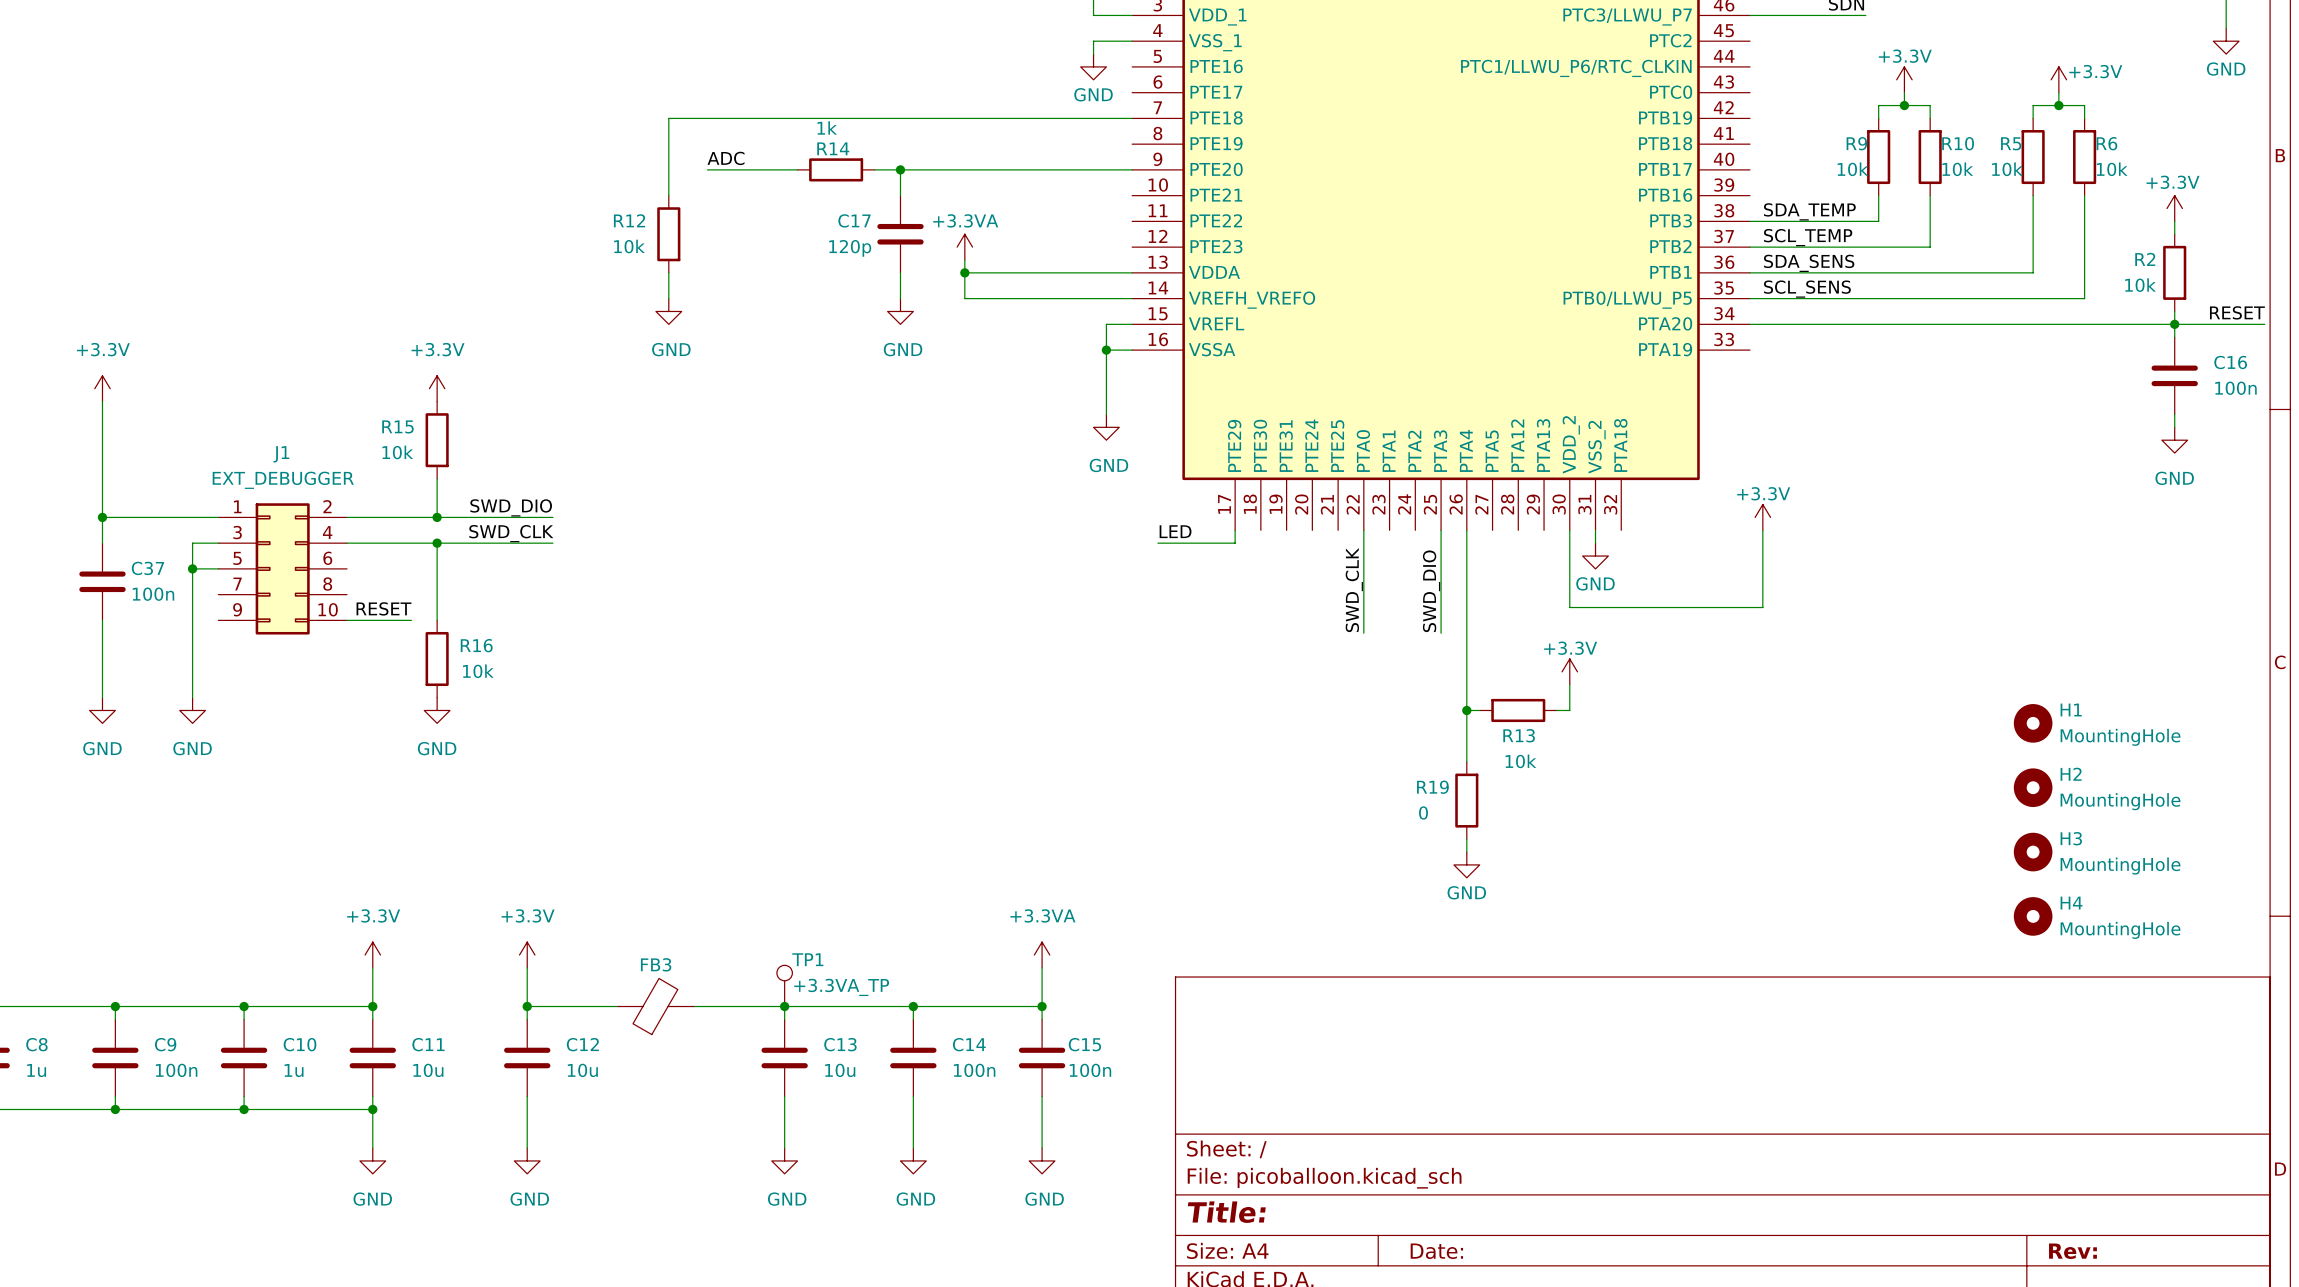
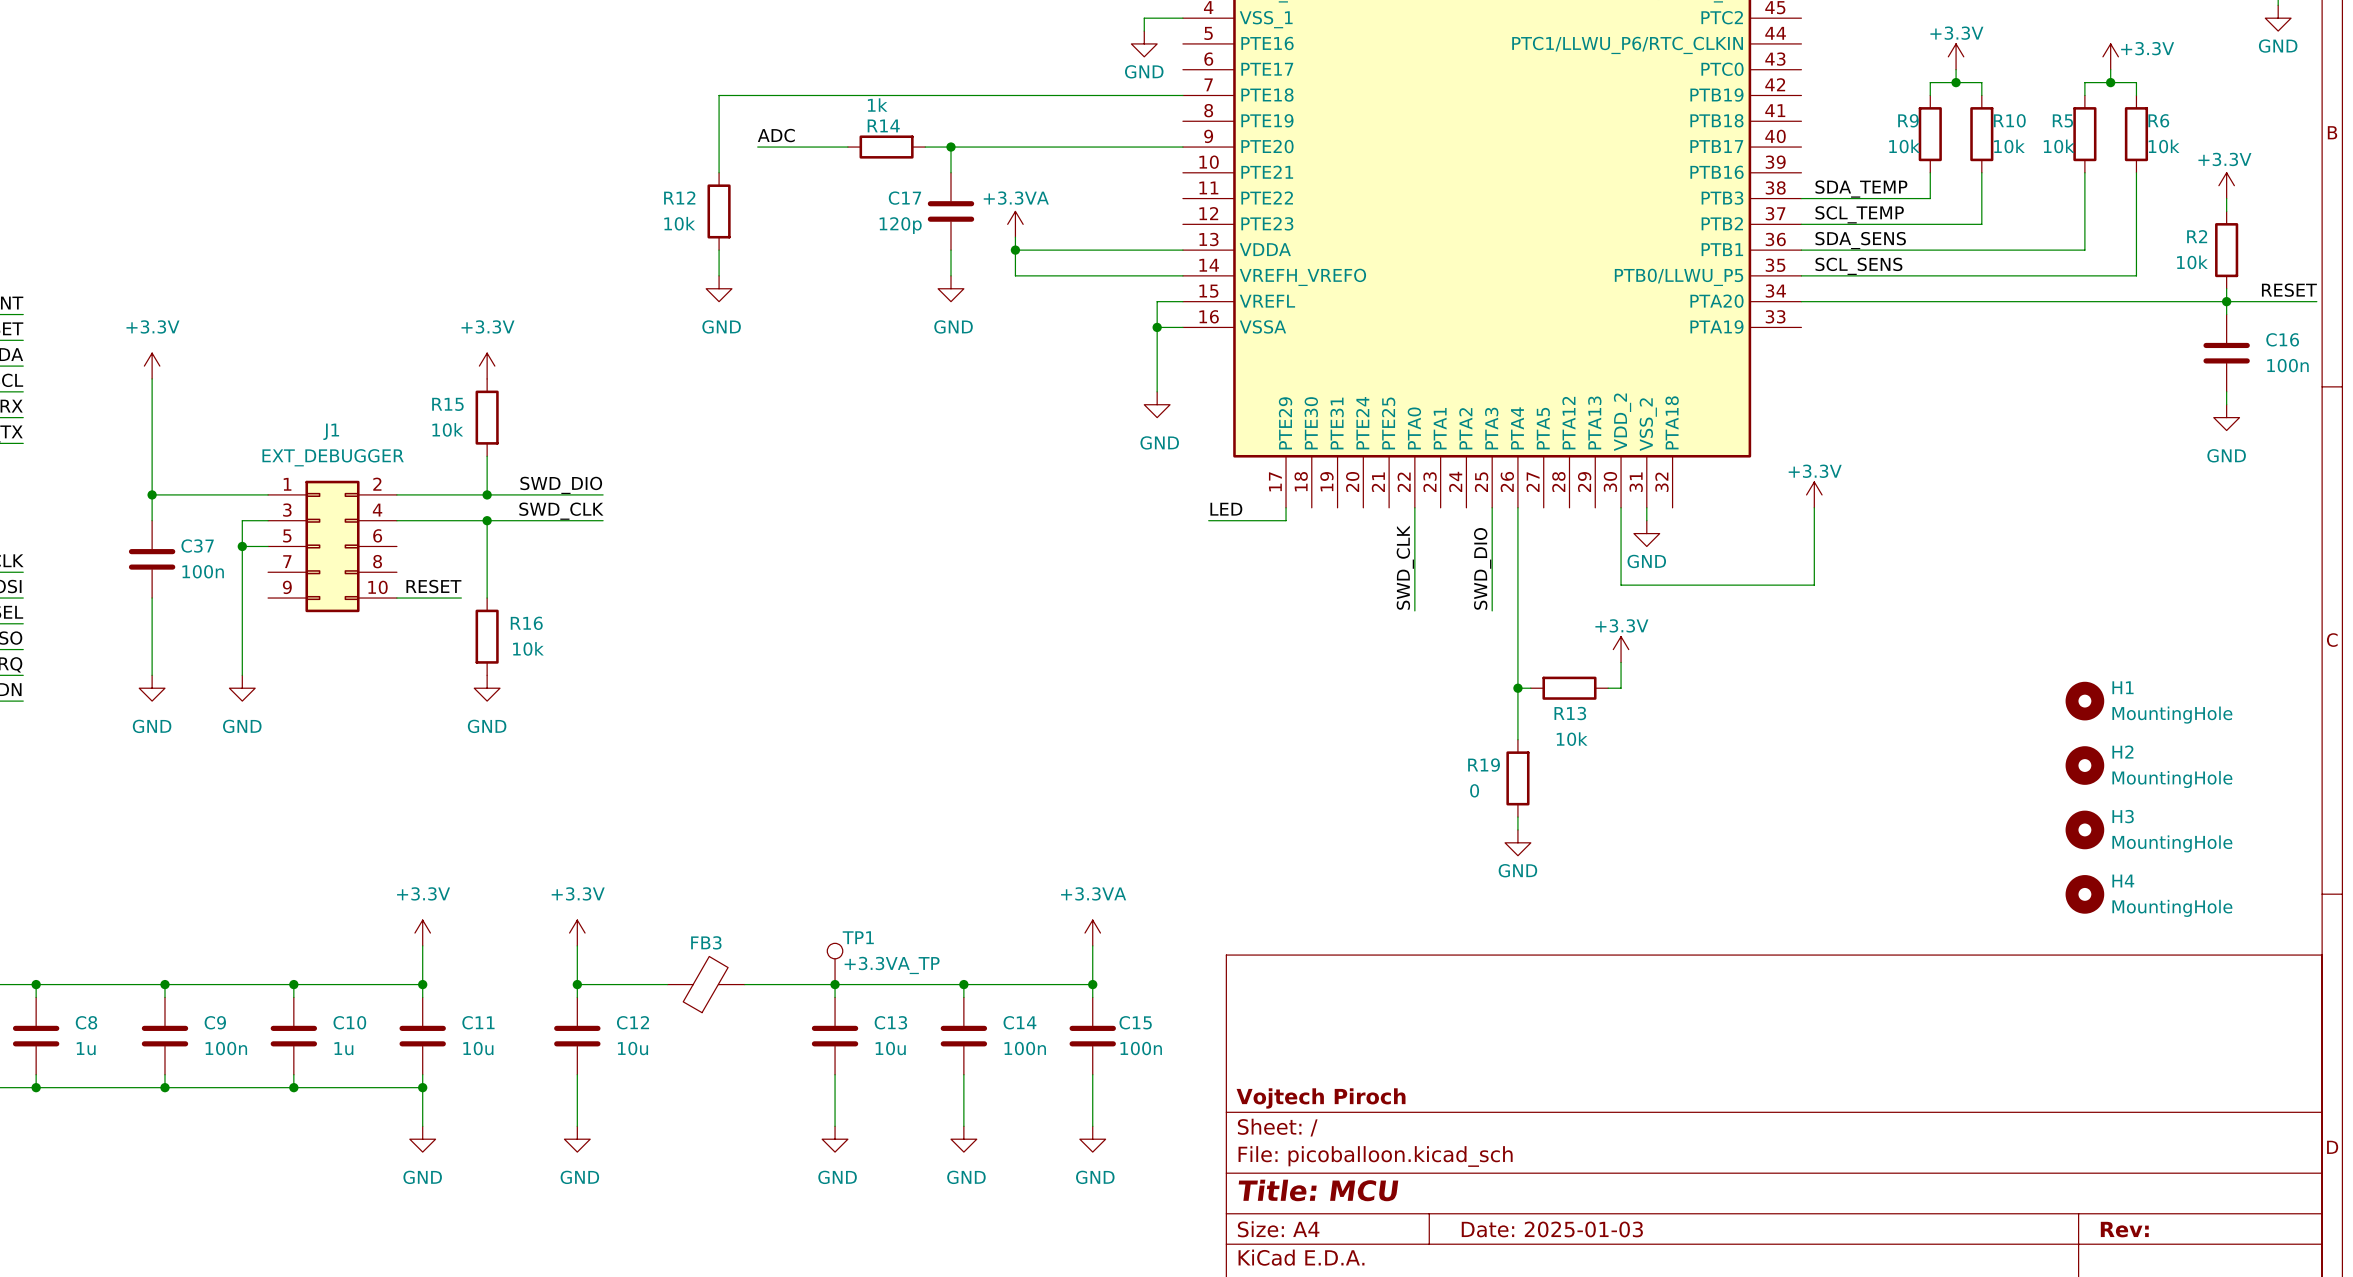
title block: none -> Vojtech Piroch (1321, 1098)
title block: Title: (1226, 1212) -> Title: MCU (1318, 1190)
title block: Date: (1436, 1251) -> Date: 2025-01-03 (1552, 1229)

